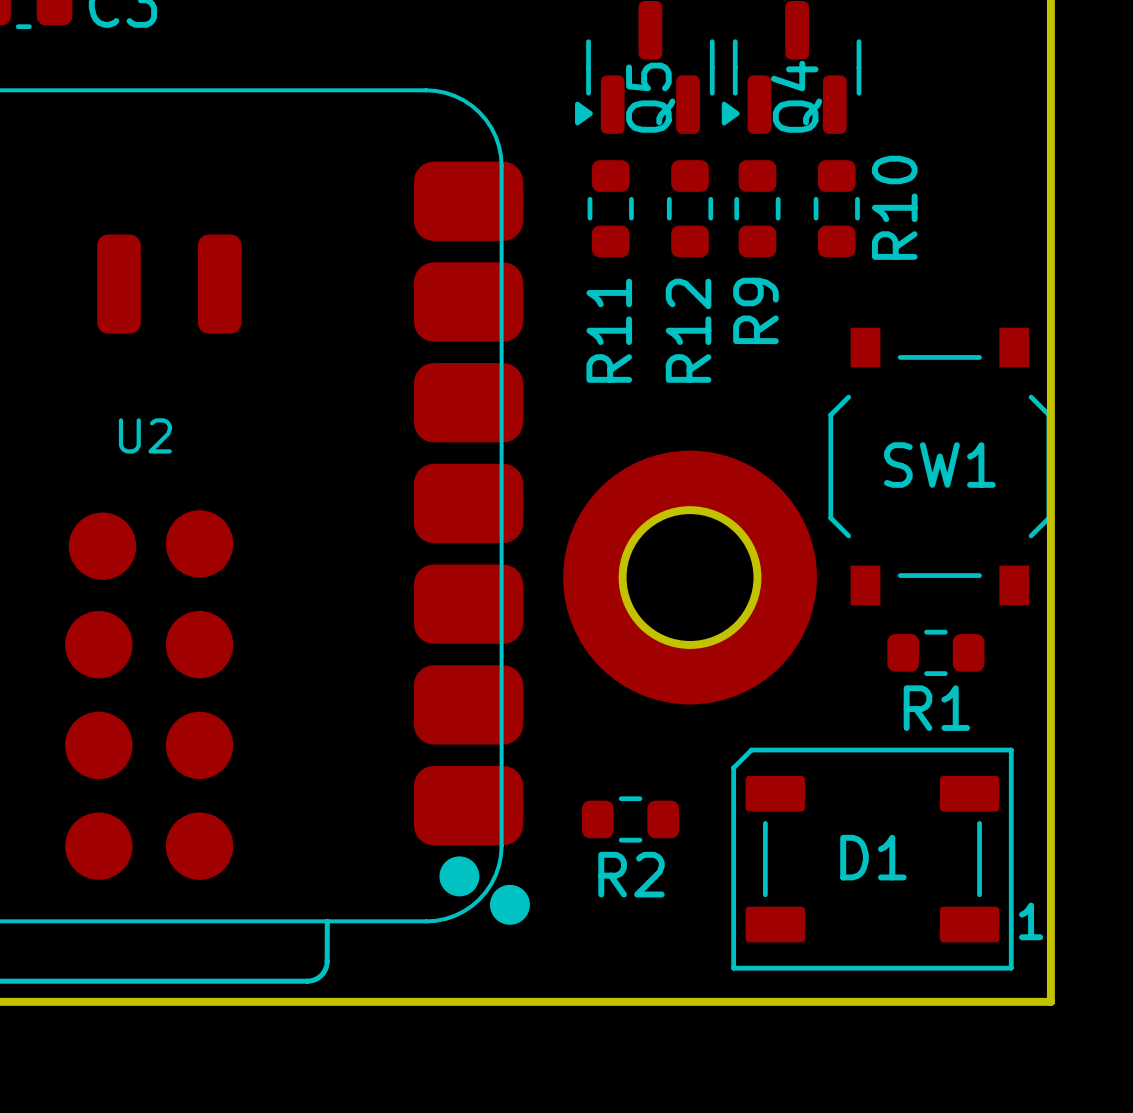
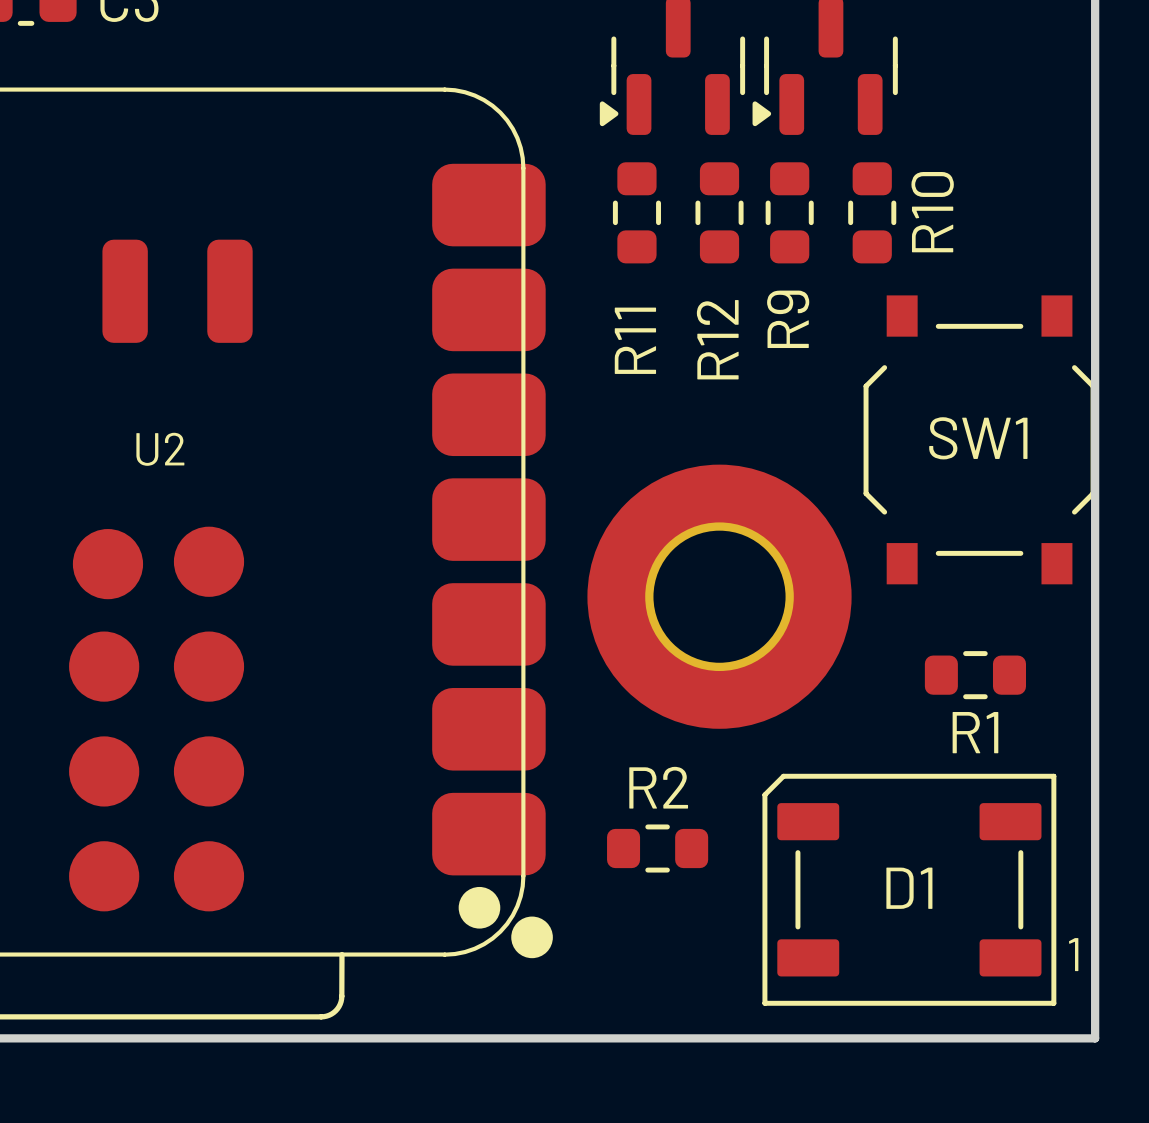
Q4 name: Q4 (796, 96) -> none
Q5 name: Q5 (650, 97) -> none
SW1 position: (939, 466) -> (979, 439)
R2 name position: R2 (631, 874) -> R2 (658, 787)

